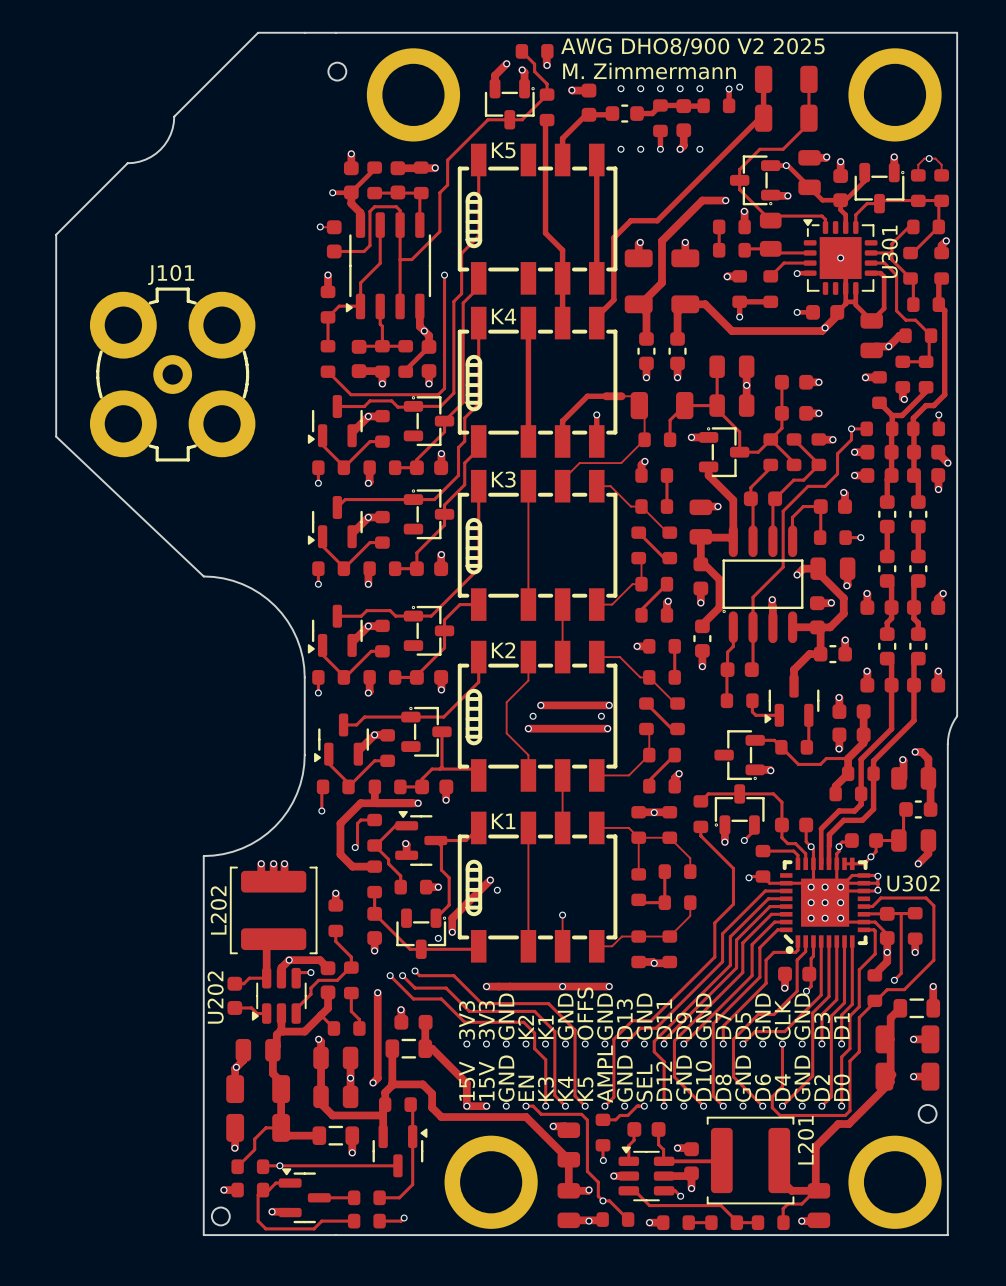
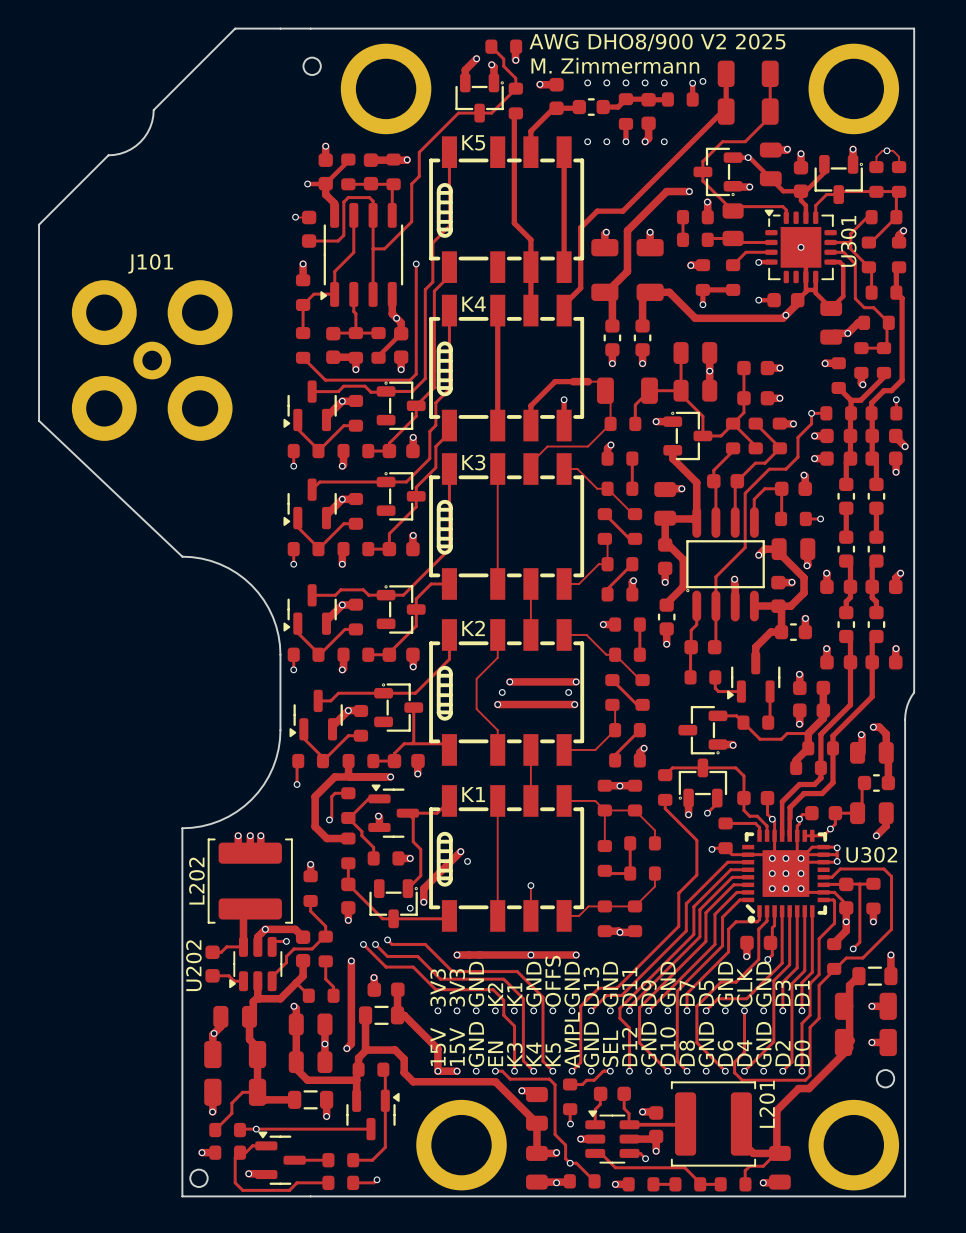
line: (150, 303) (157, 301) (157, 289) (188, 289) (188, 301) (195, 303) -> none
line: (101, 351) (97, 371) (101, 397) -> none
line: (244, 351) (247, 371) (244, 397) -> none
line: (150, 446) (157, 447) (157, 459) (188, 459) (188, 447) (195, 446) -> none

